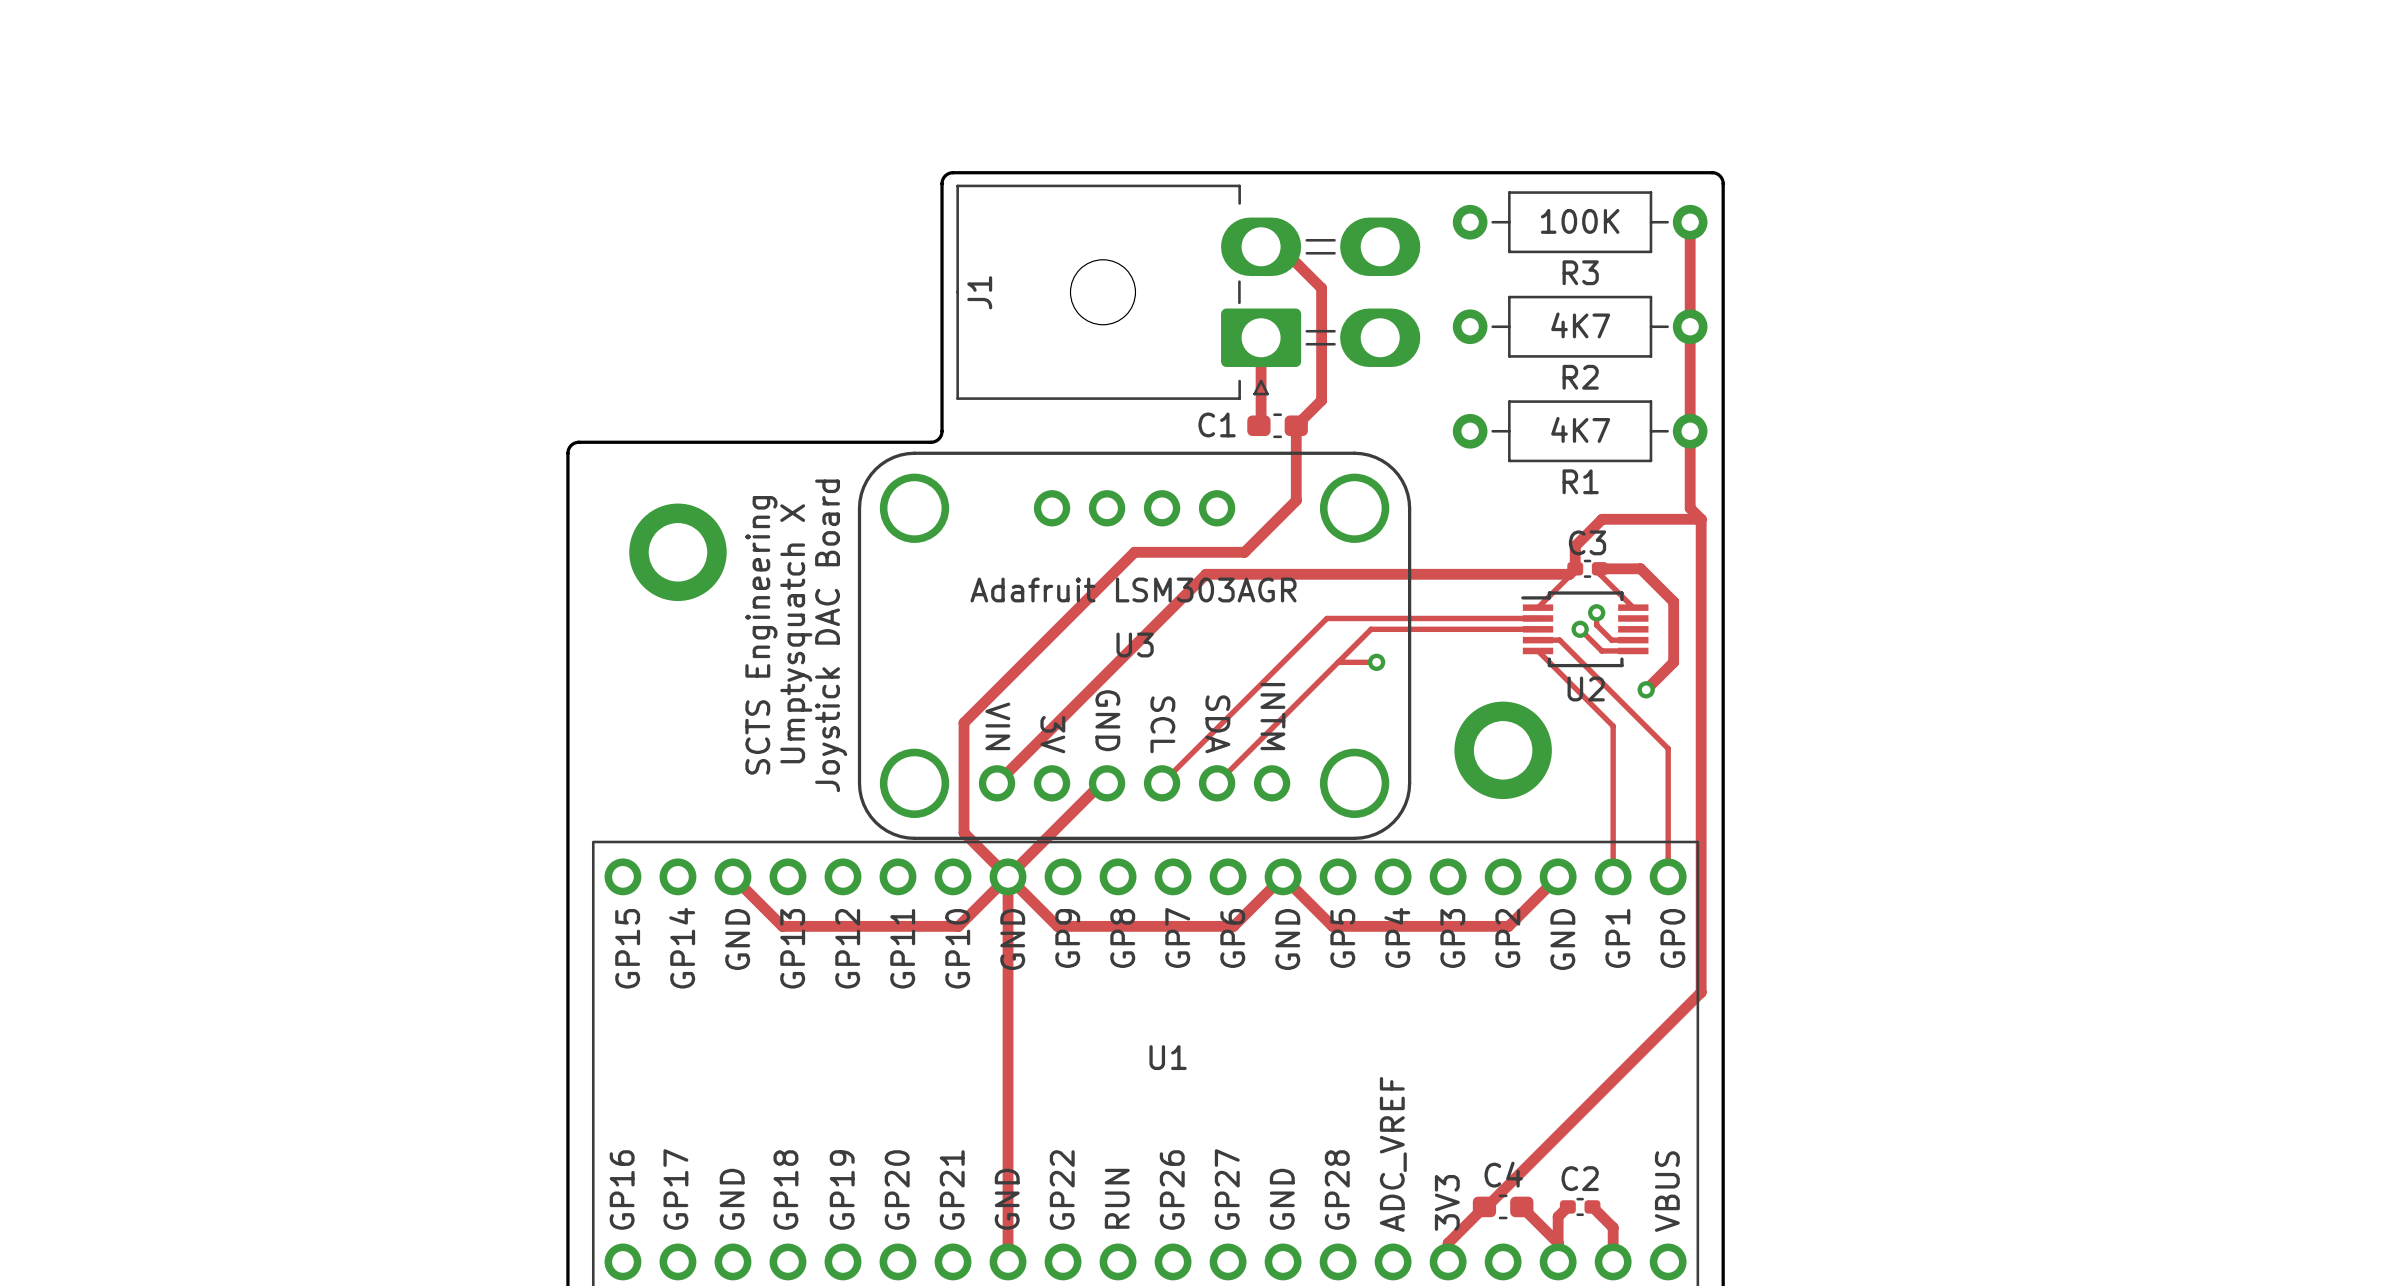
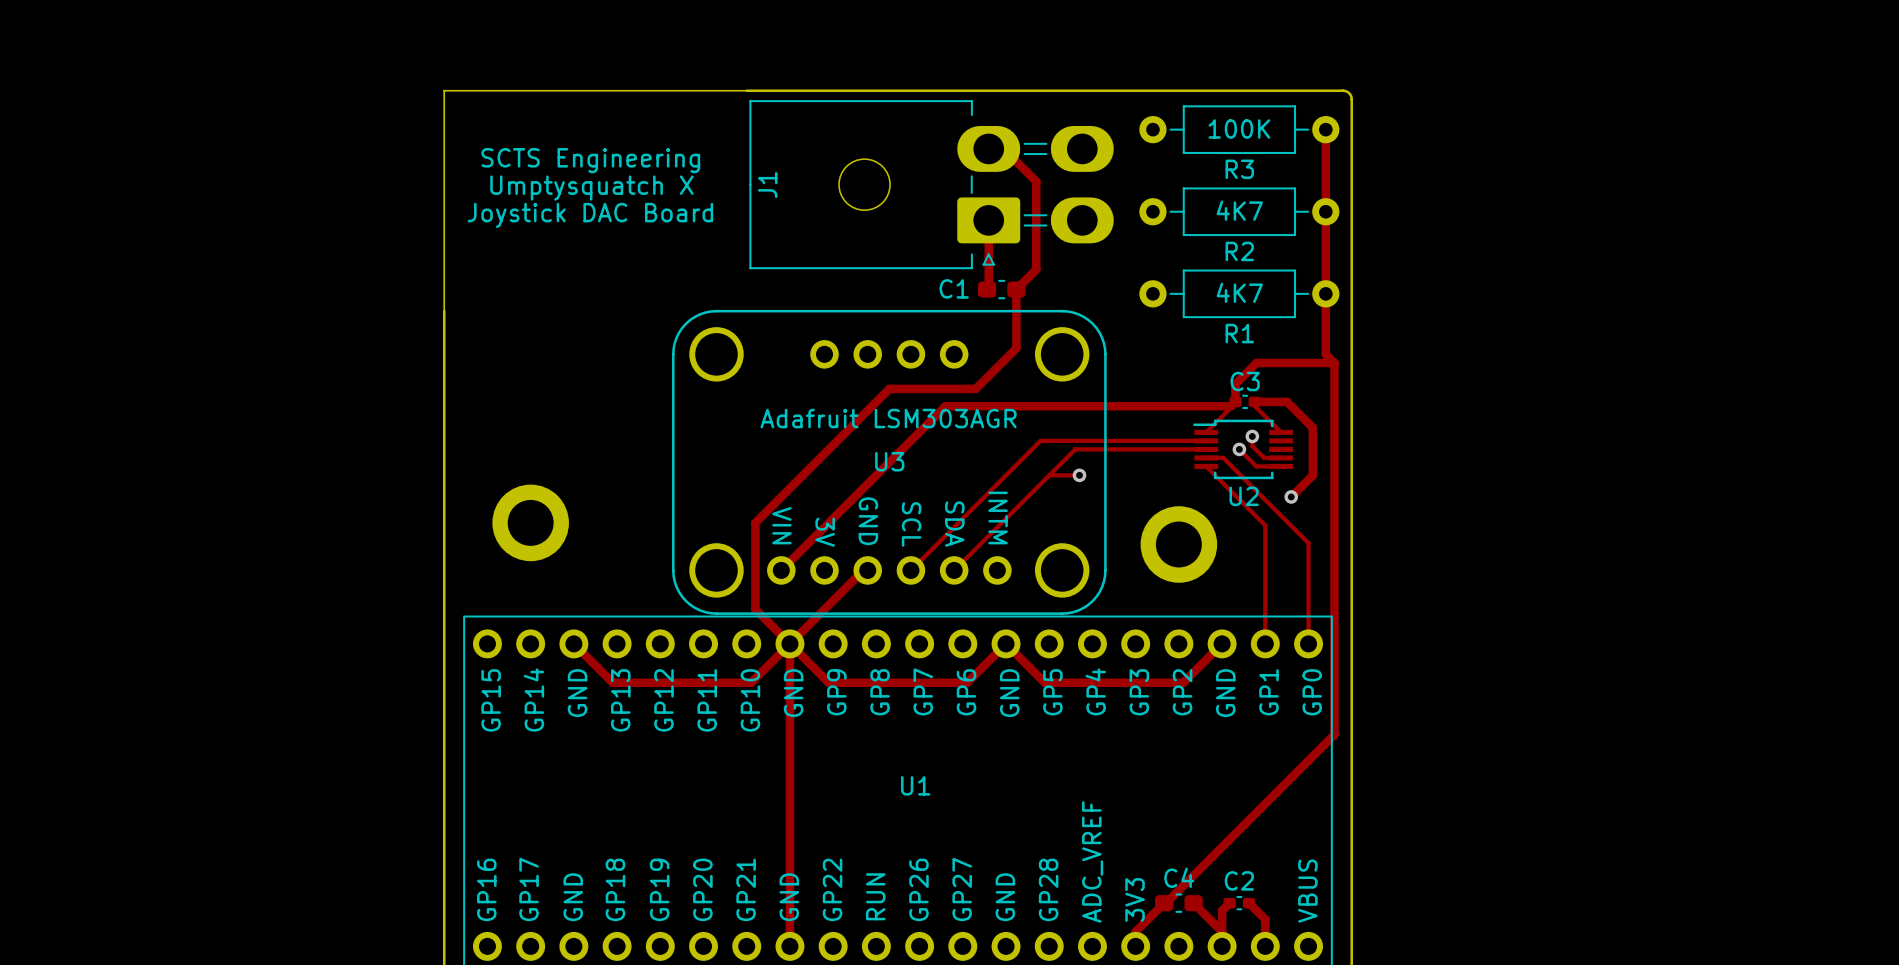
board edge: (953, 172) (945, 175) (942, 182) (942, 431) (937, 439) (931, 442) (578, 442) (571, 445) (567, 453) -> (746, 90) (444, 90) (444, 311)
part position: (677, 552) -> (530, 522)
text rotation: 0° (796, 633) -> 90° clockwise (591, 188)
text position: Umptysquatch X (796, 633) -> Umptysquatch X (591, 188)
text rotation: 0° (761, 635) -> 90° clockwise (590, 160)
text position: SCTS Engineering (761, 635) -> SCTS Engineering (590, 160)
text rotation: 0° (831, 635) -> 90° clockwise (590, 215)

